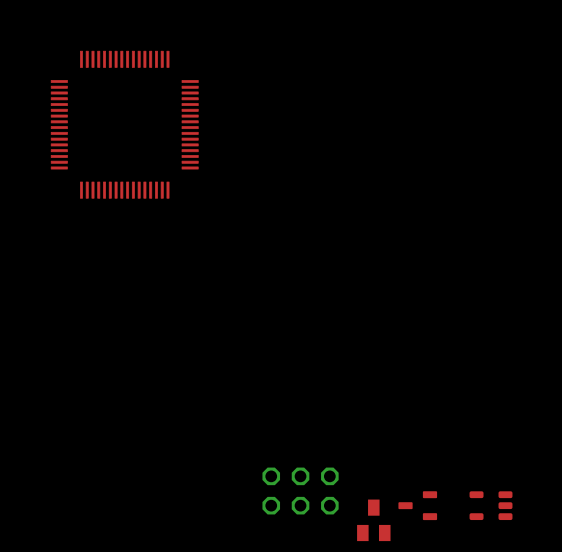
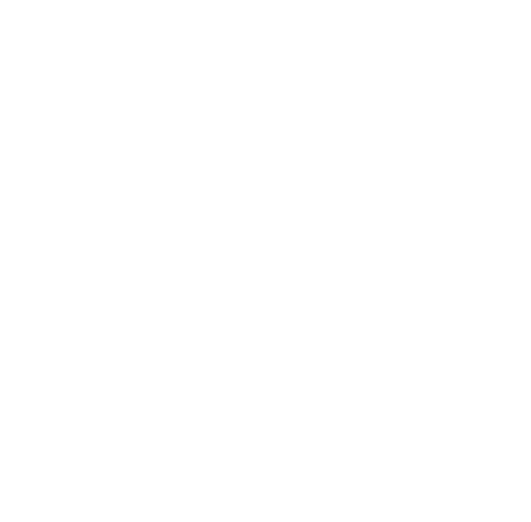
part: (124, 124) -> none
part: (300, 491) -> none
part: (417, 505) -> none
part: (491, 505) -> none
part: (373, 520) -> none

